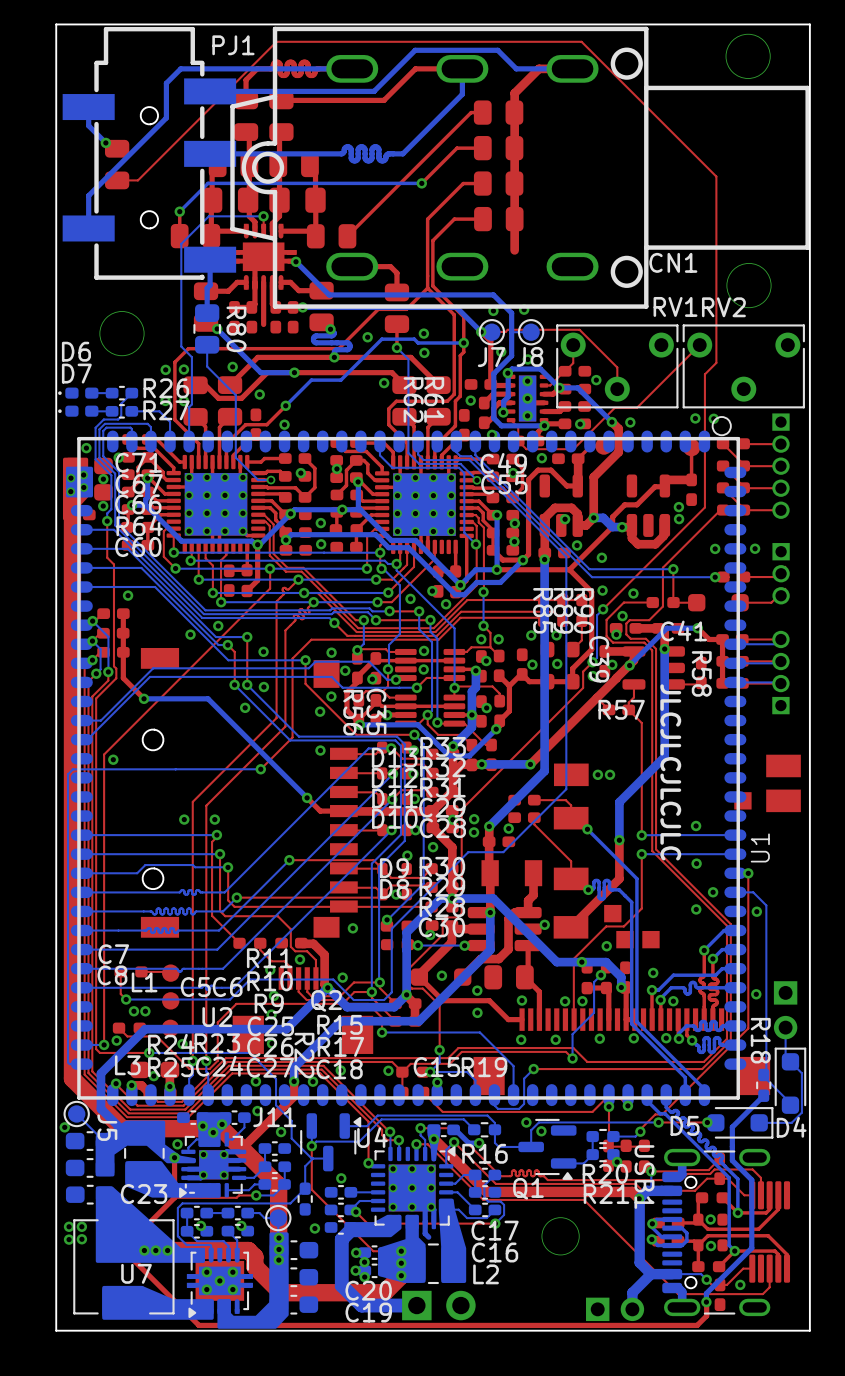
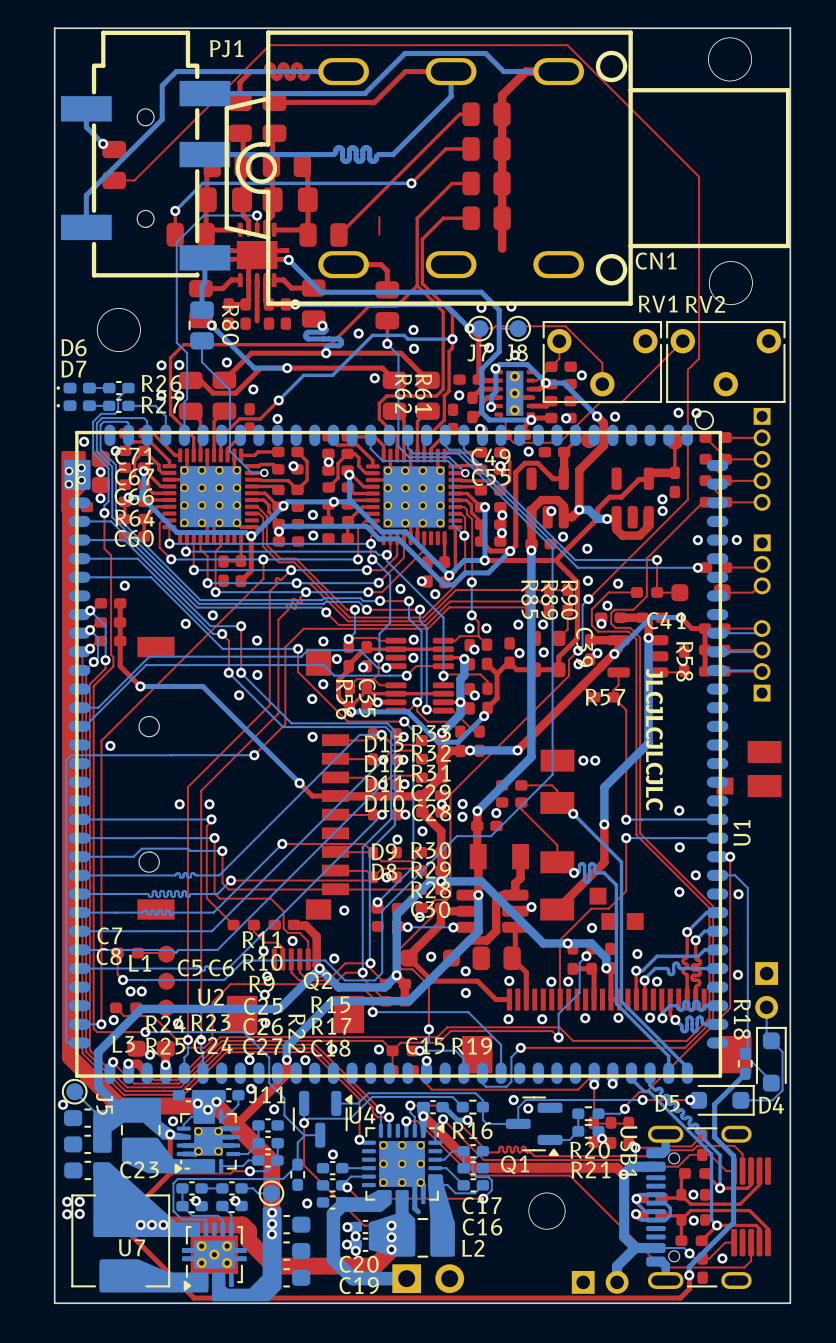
top track: none -> (379, 217) (379, 234)

